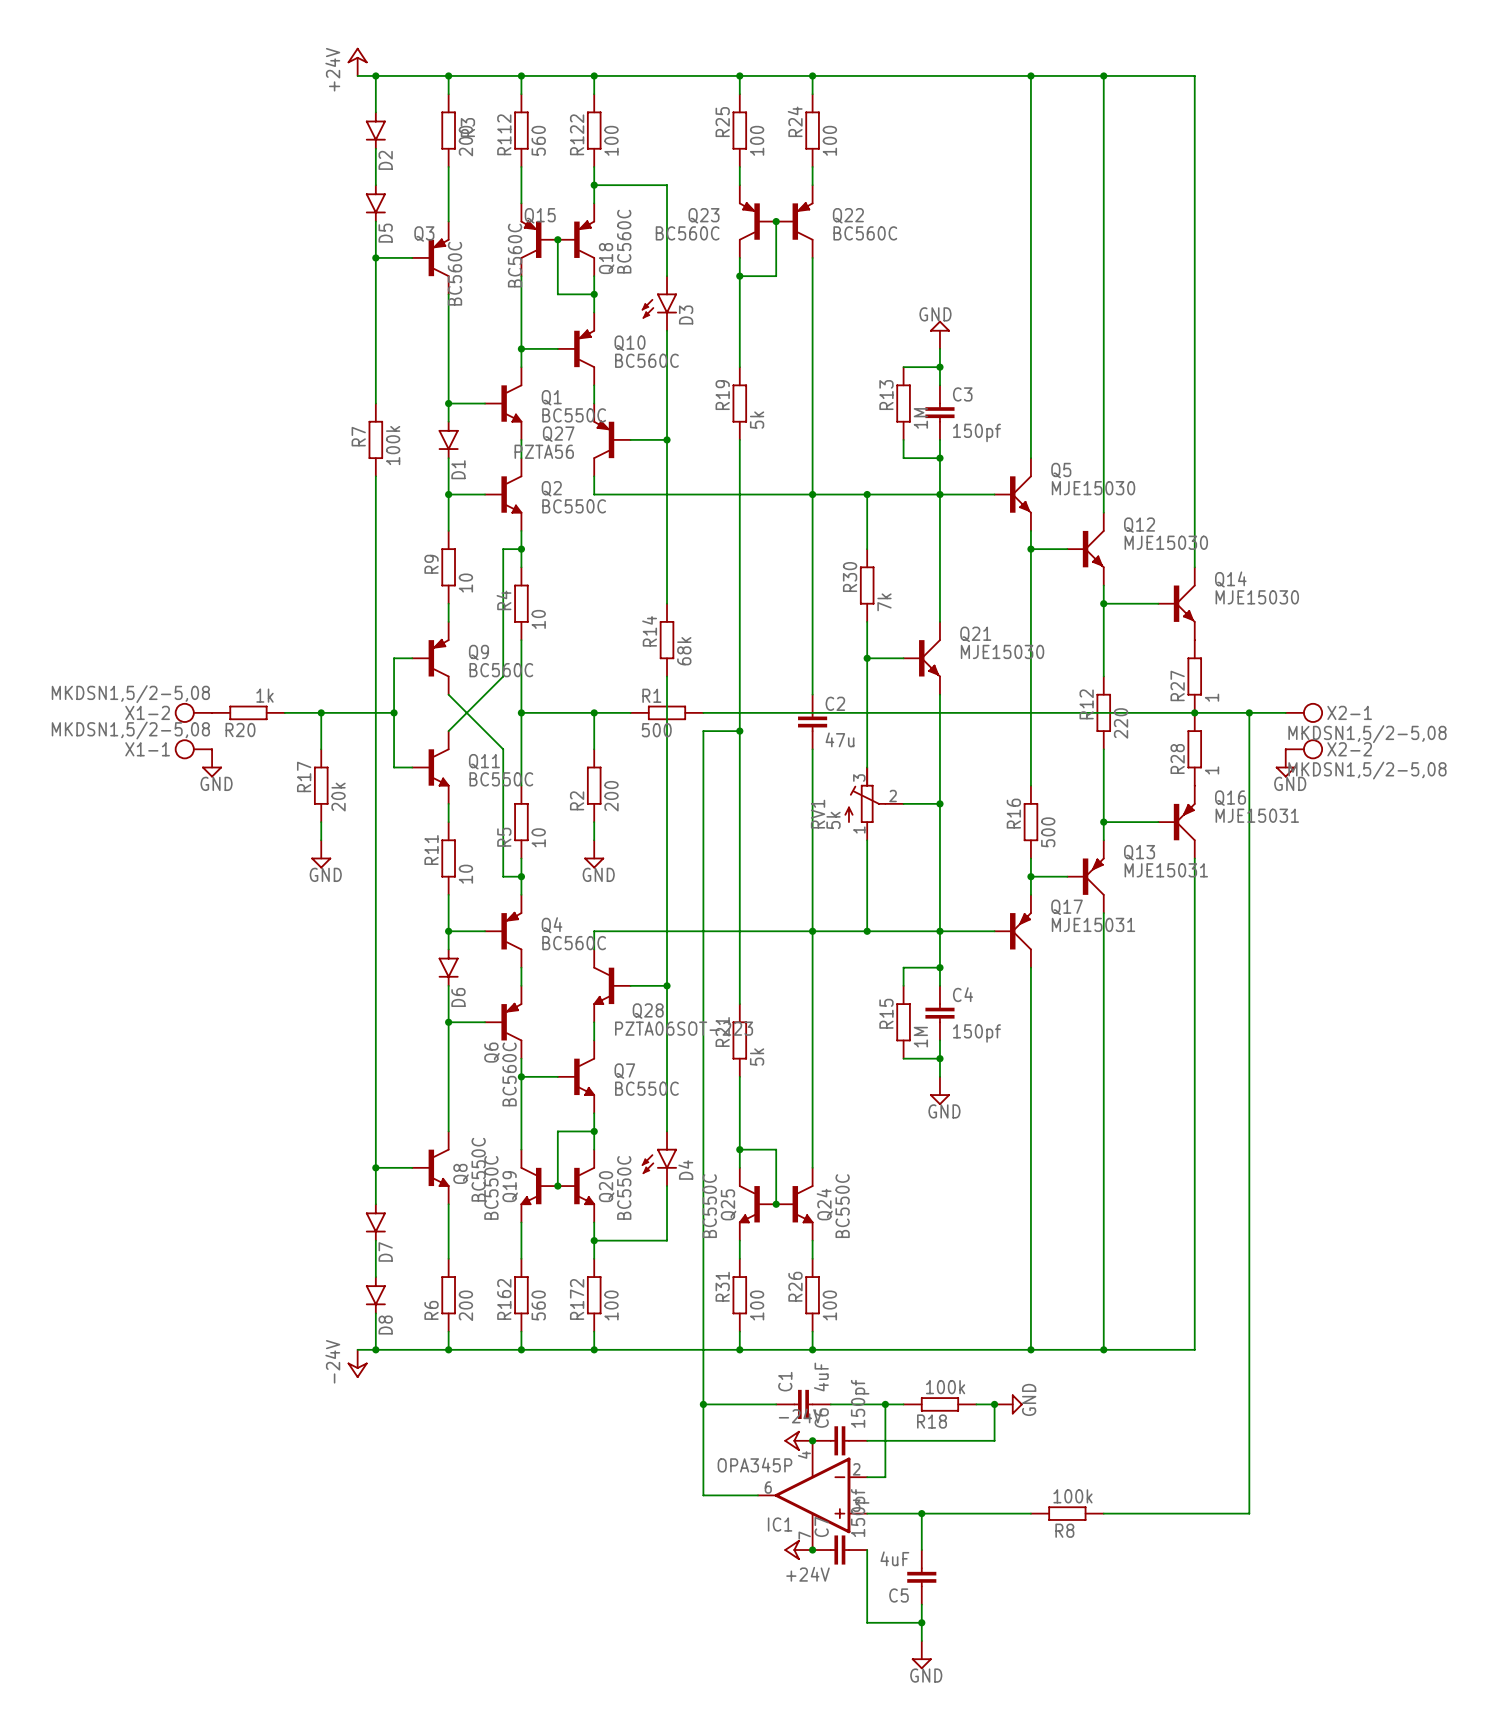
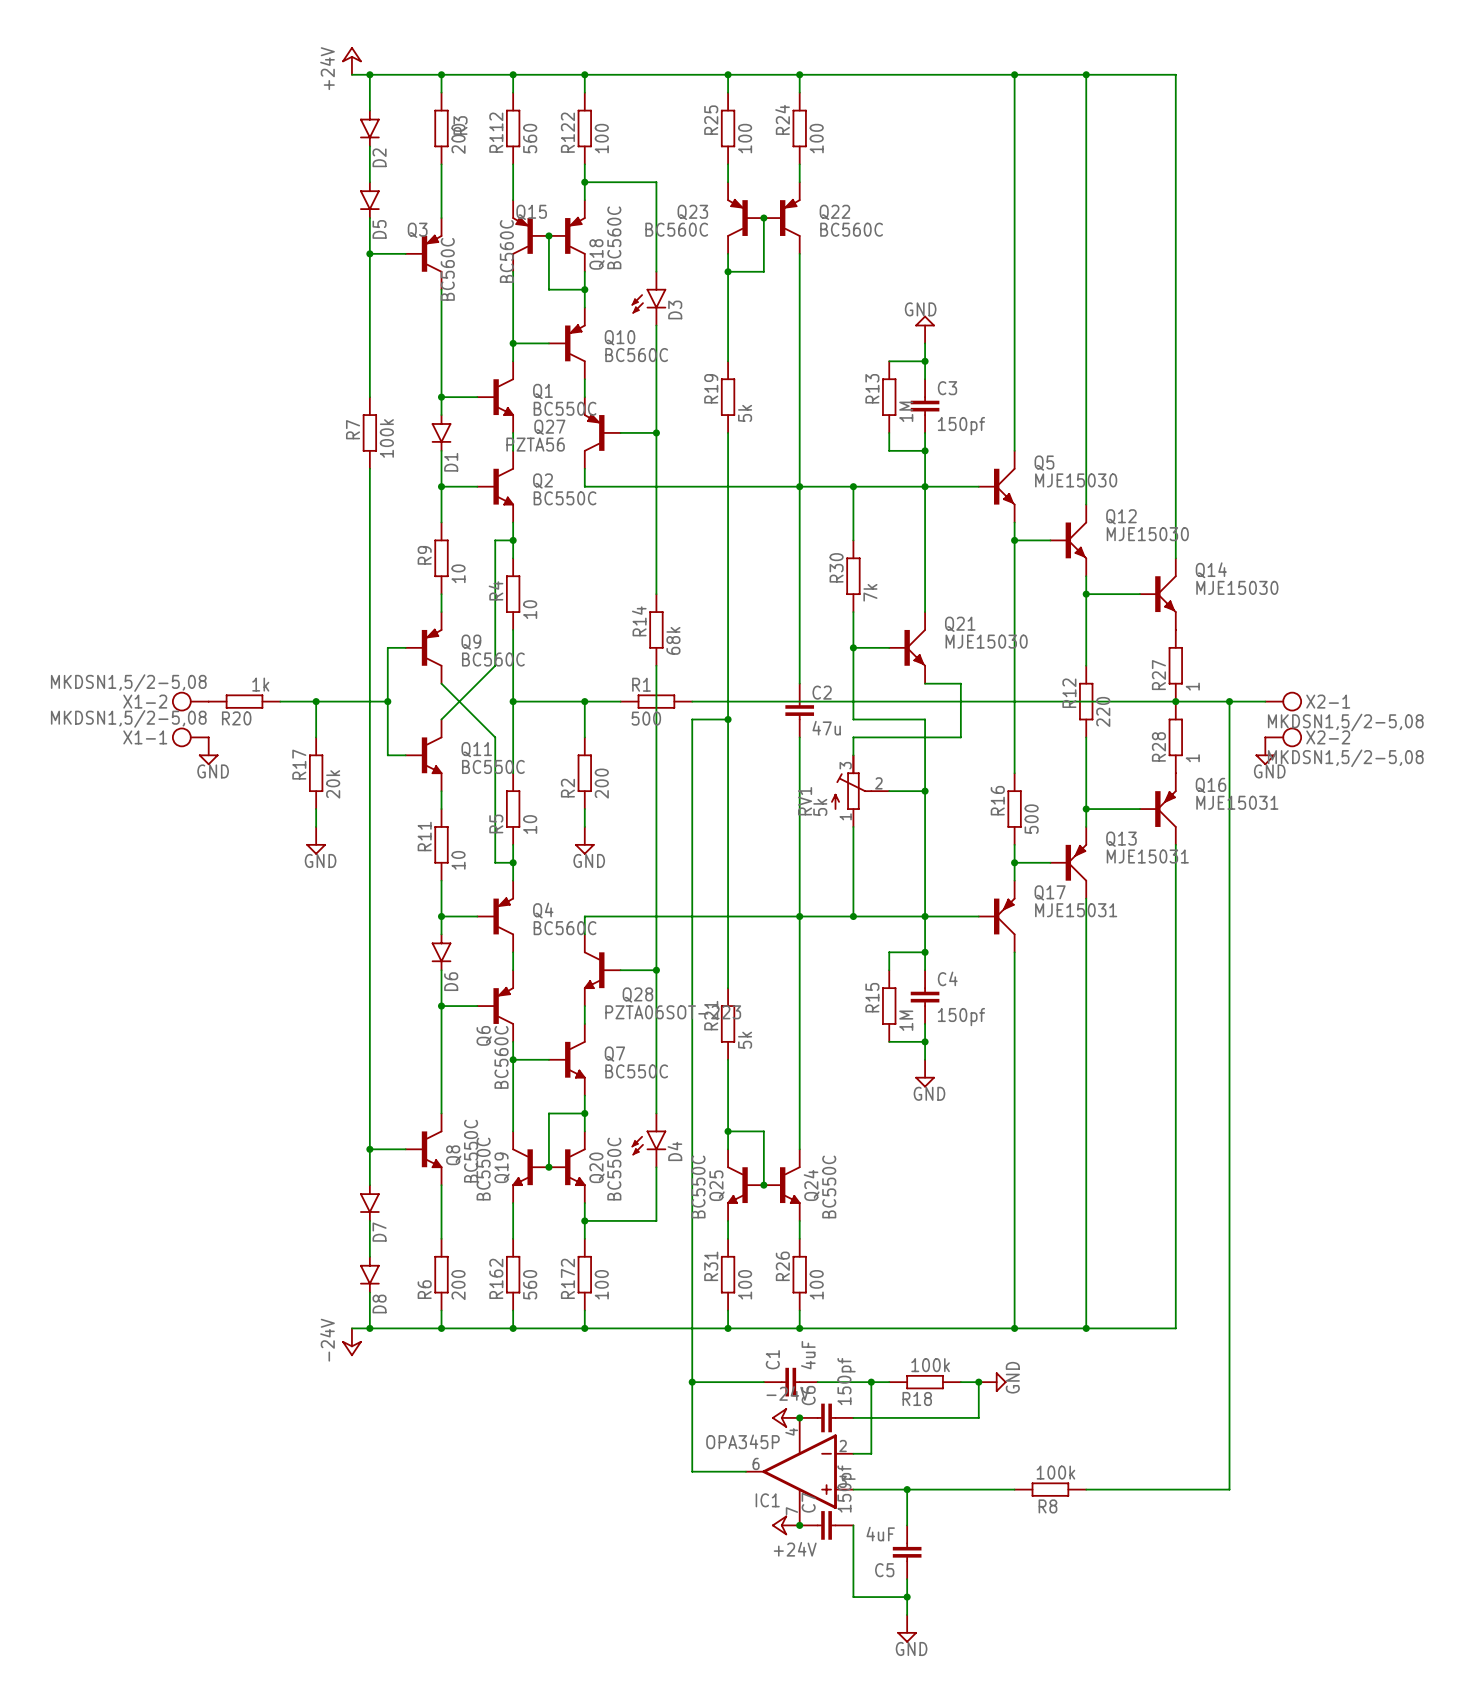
wire: (939, 694) (939, 731) -> (925, 683) (960, 683) (960, 737) (853, 737)
wire: (867, 731) (867, 749) -> (853, 719) (925, 719)

